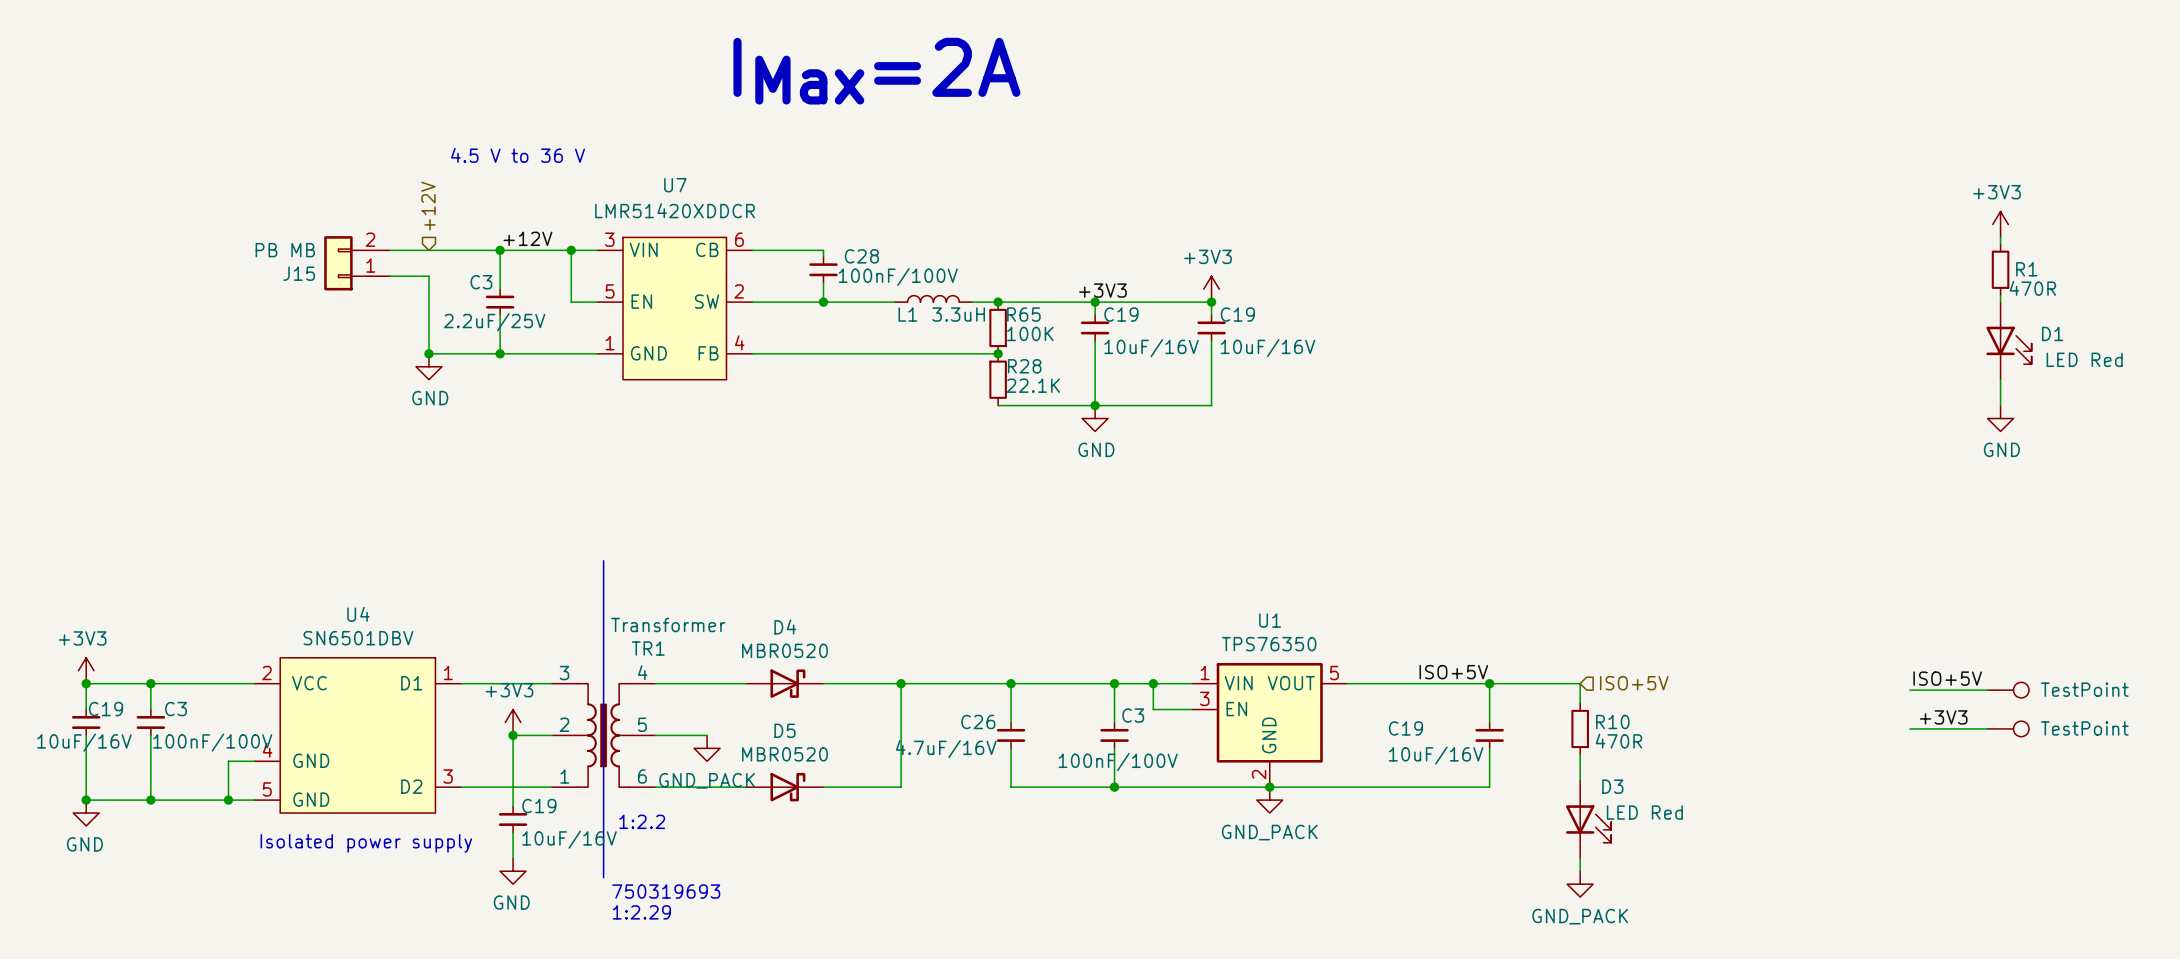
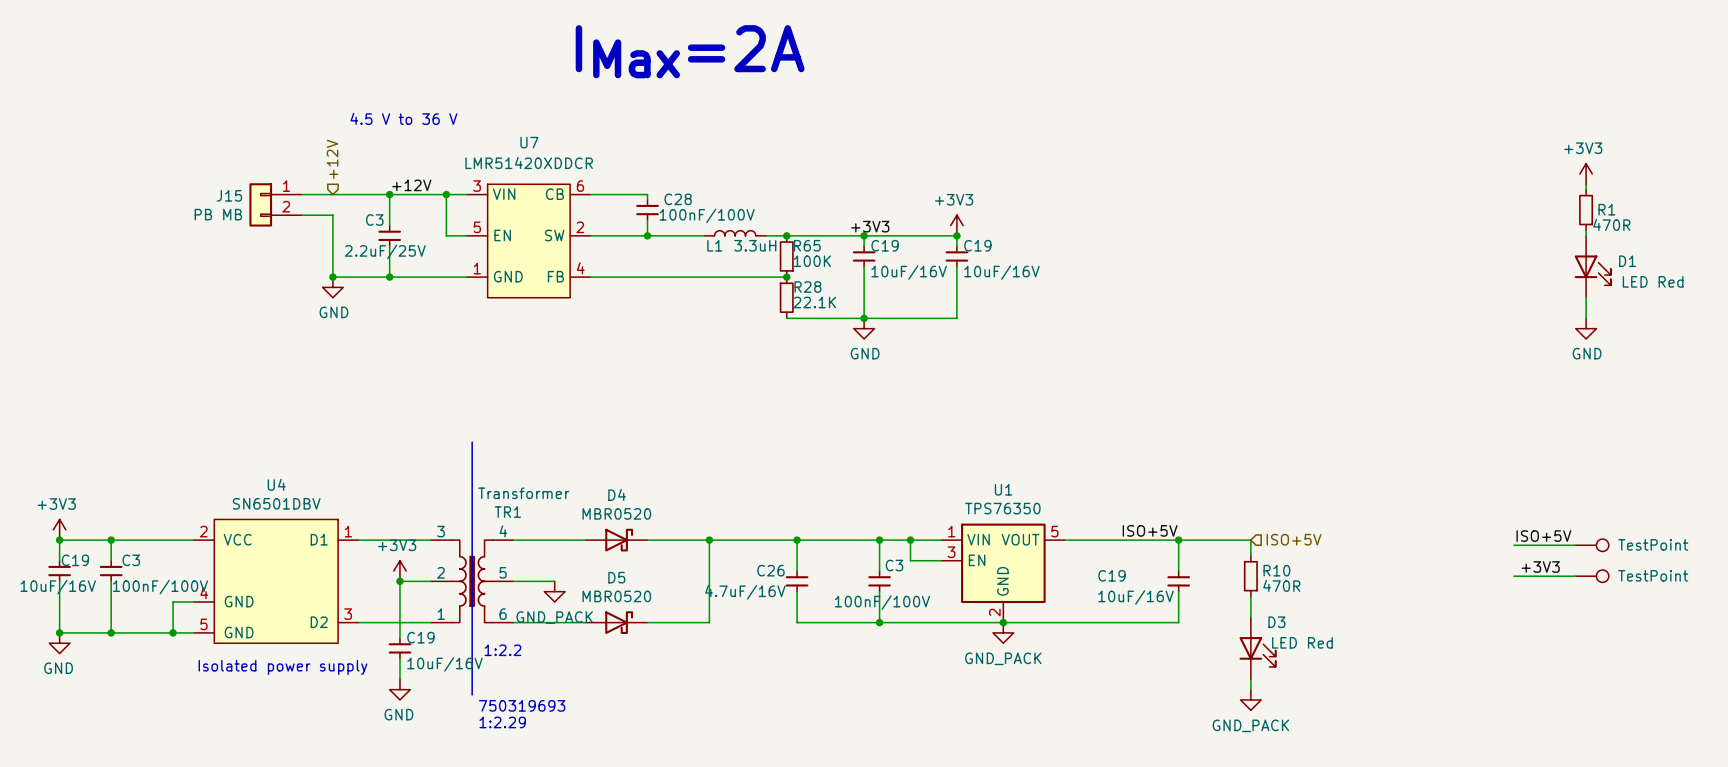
J15 flip: as is (338, 263) -> up-down (260, 204)

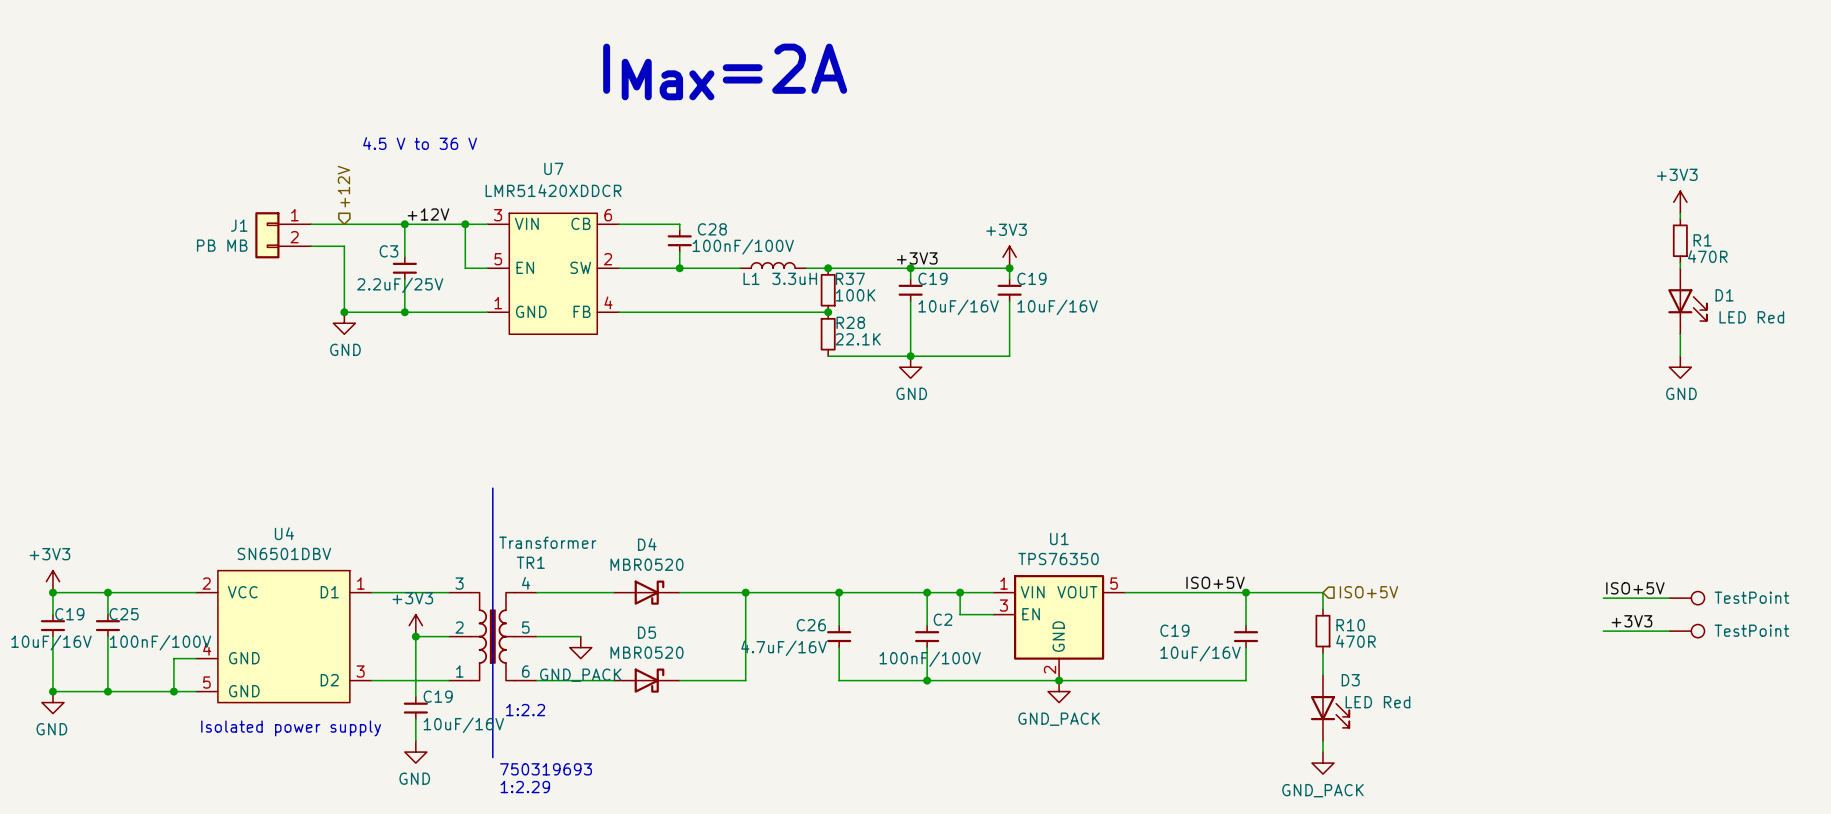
J15 name: J15 (229, 195) -> J1 (239, 225)
R65 name: R65 (807, 245) -> R37 (850, 278)
C3 name: C3 (131, 560) -> C25 (124, 614)
C3 name: C3 (894, 565) -> C2 (943, 619)

